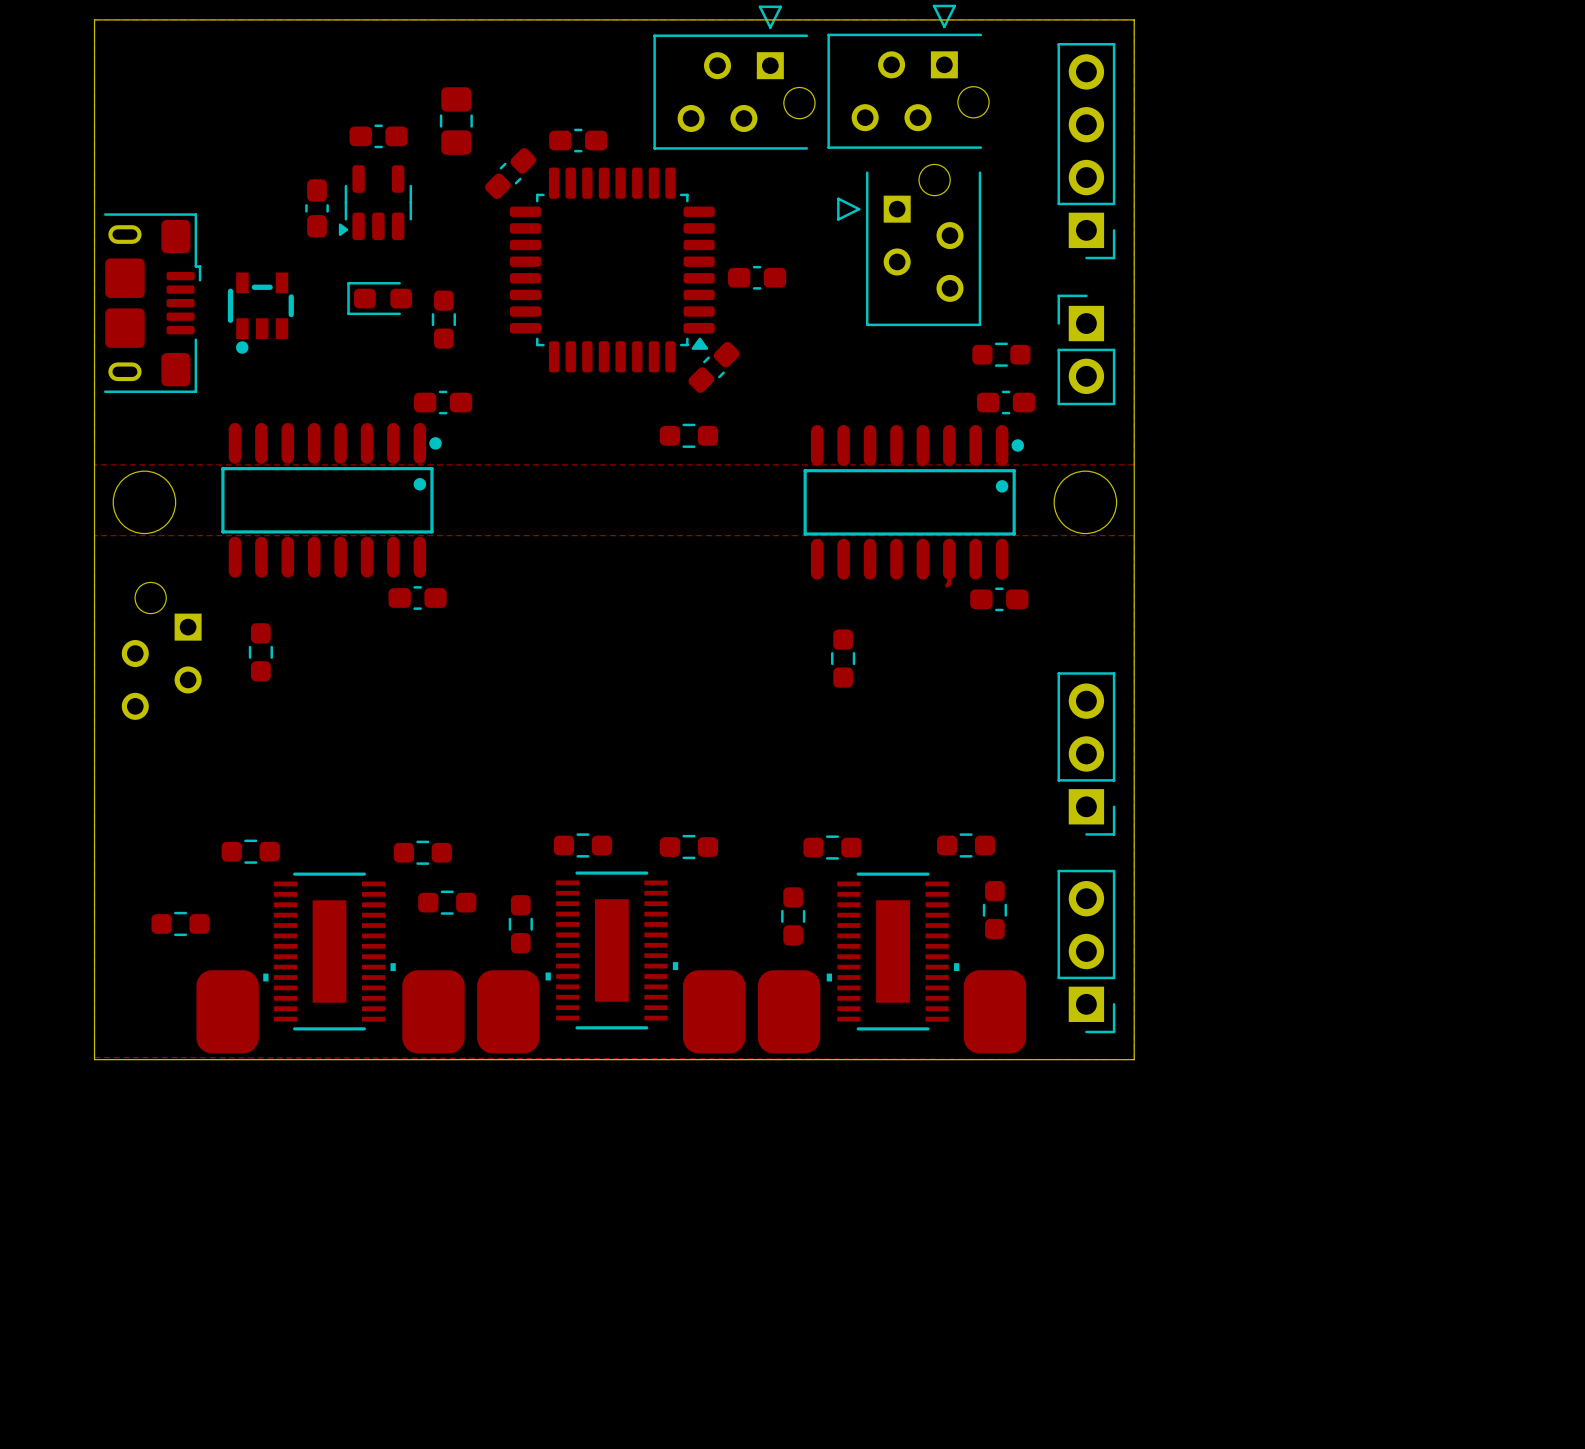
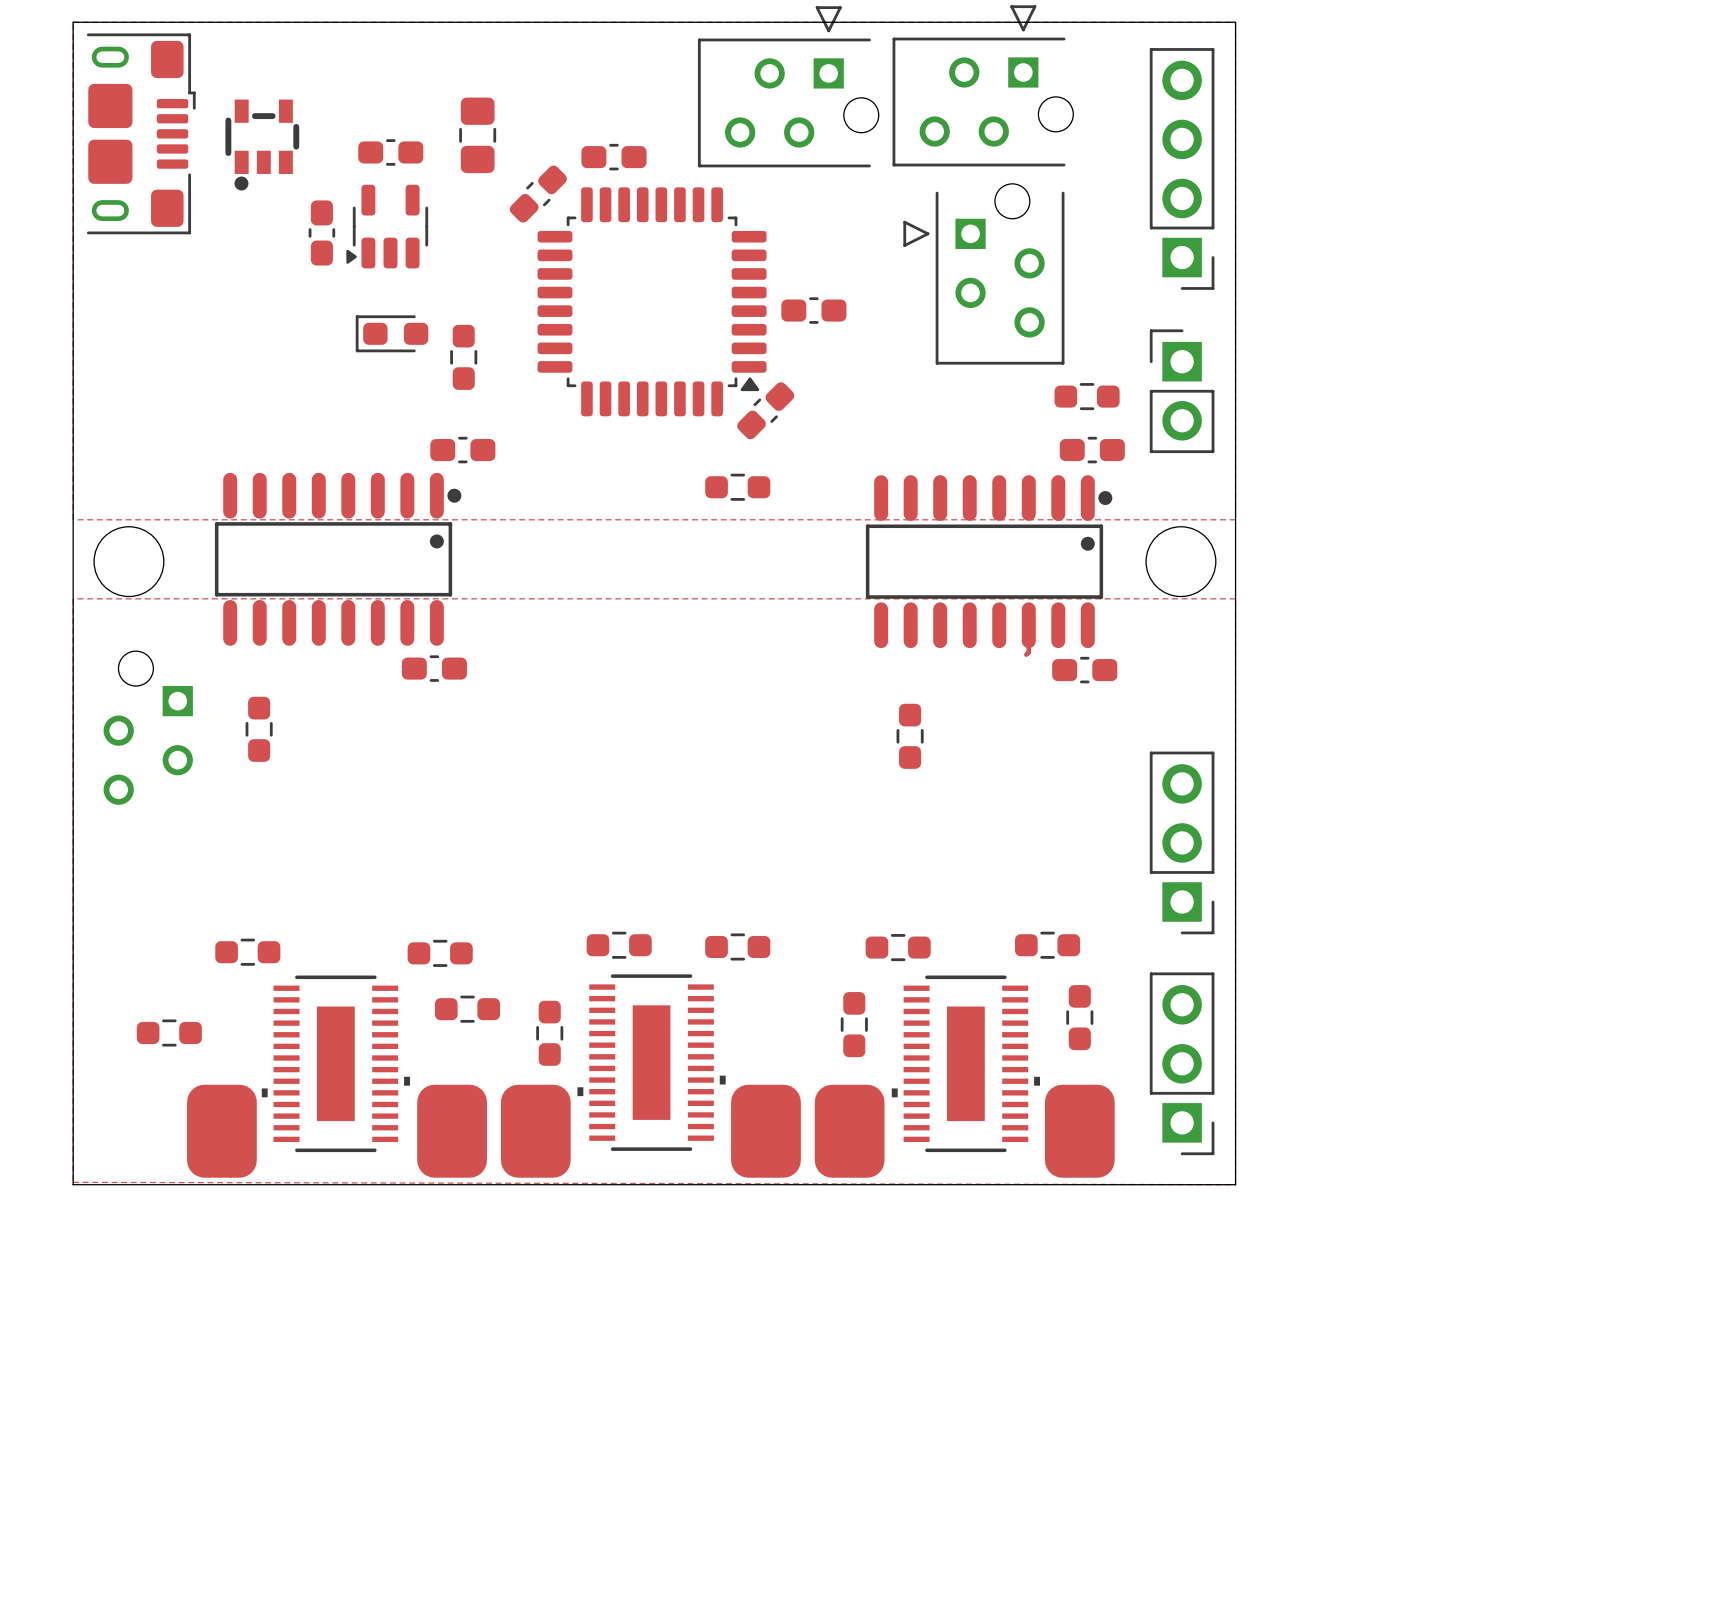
part position: (152, 303) -> (141, 133)
part position: (260, 313) -> (262, 145)

